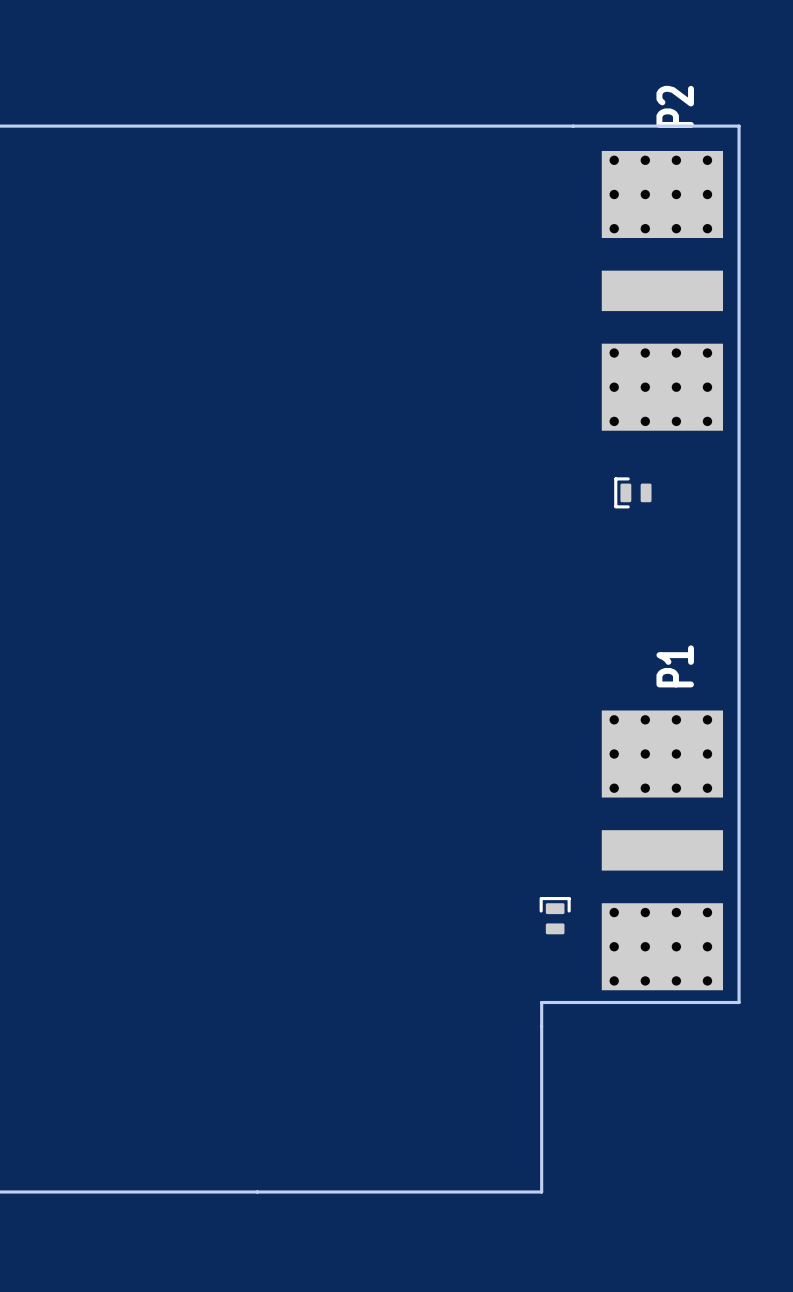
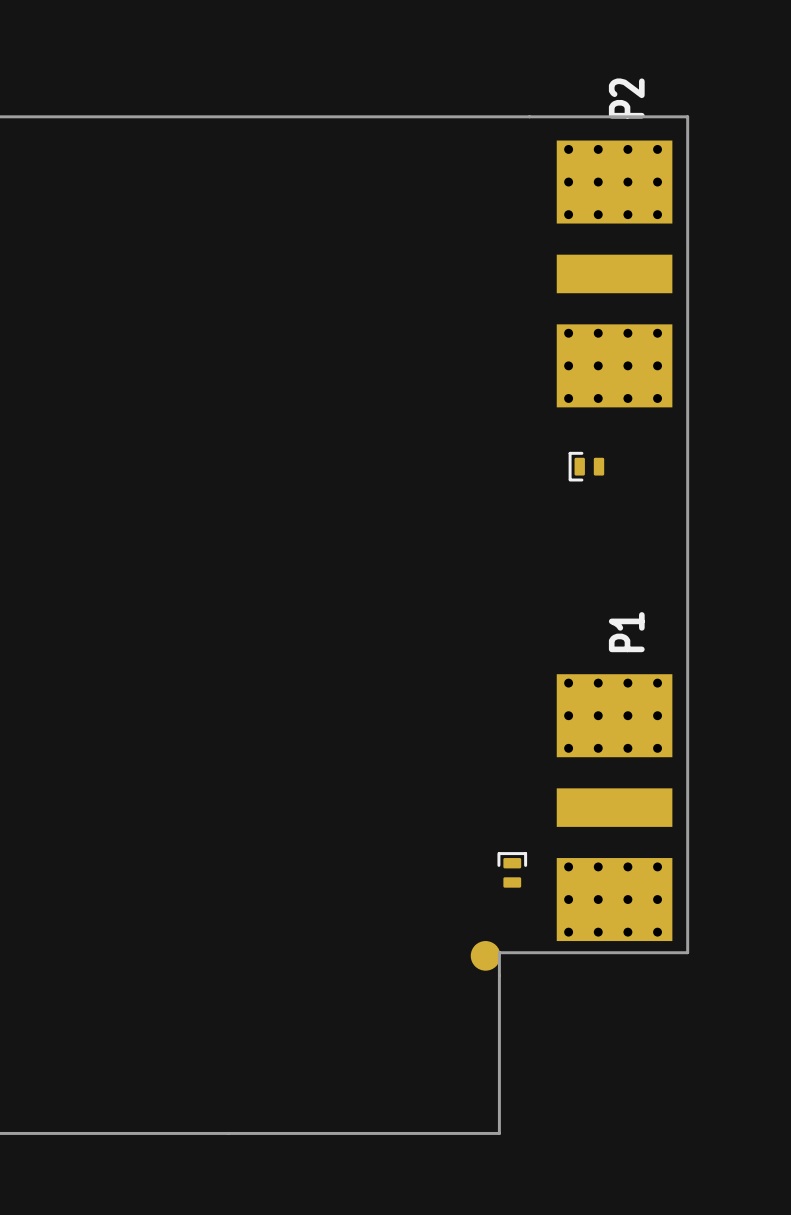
part: none -> (485, 955)

